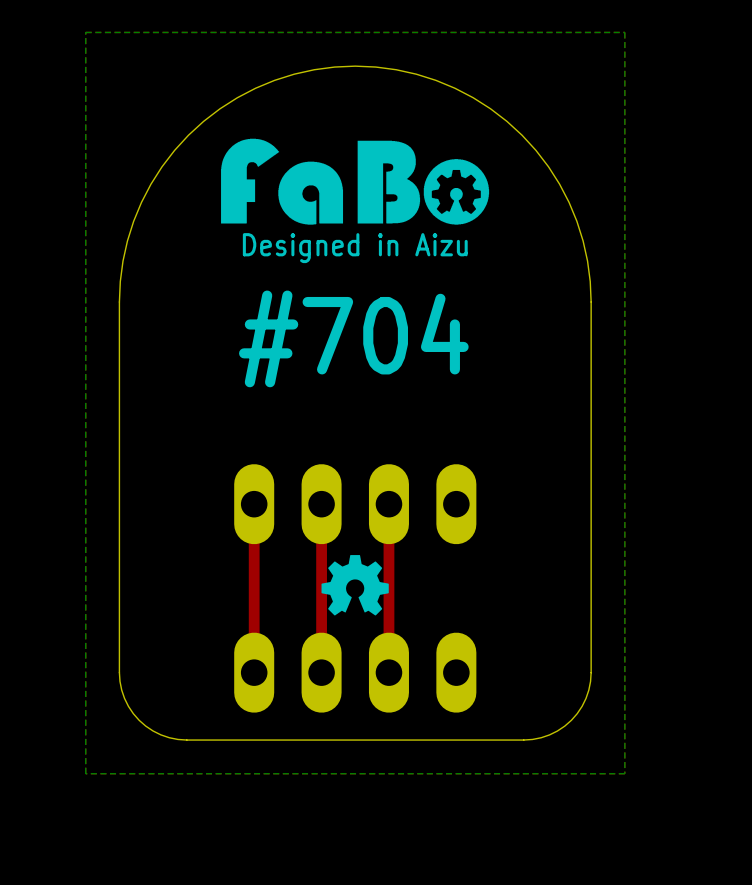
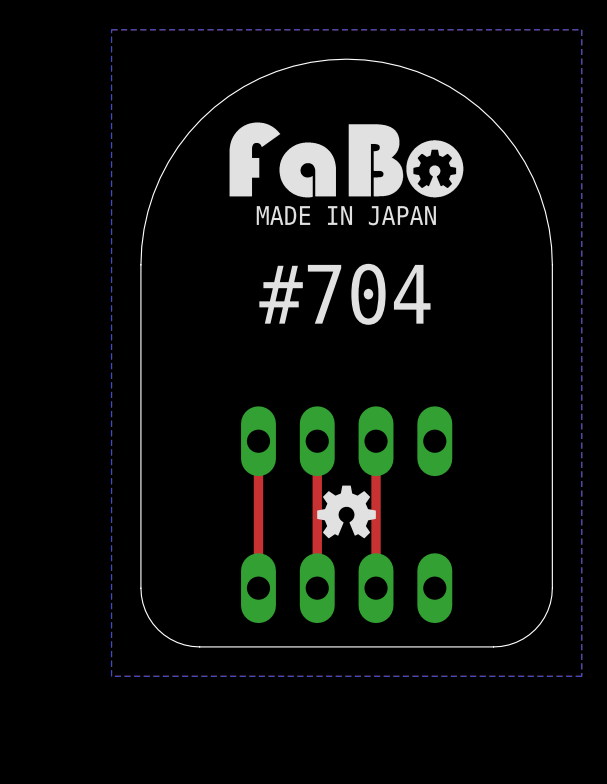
text: Designed in Aizu (355, 248) -> MADE IN JAPAN (346, 215)

